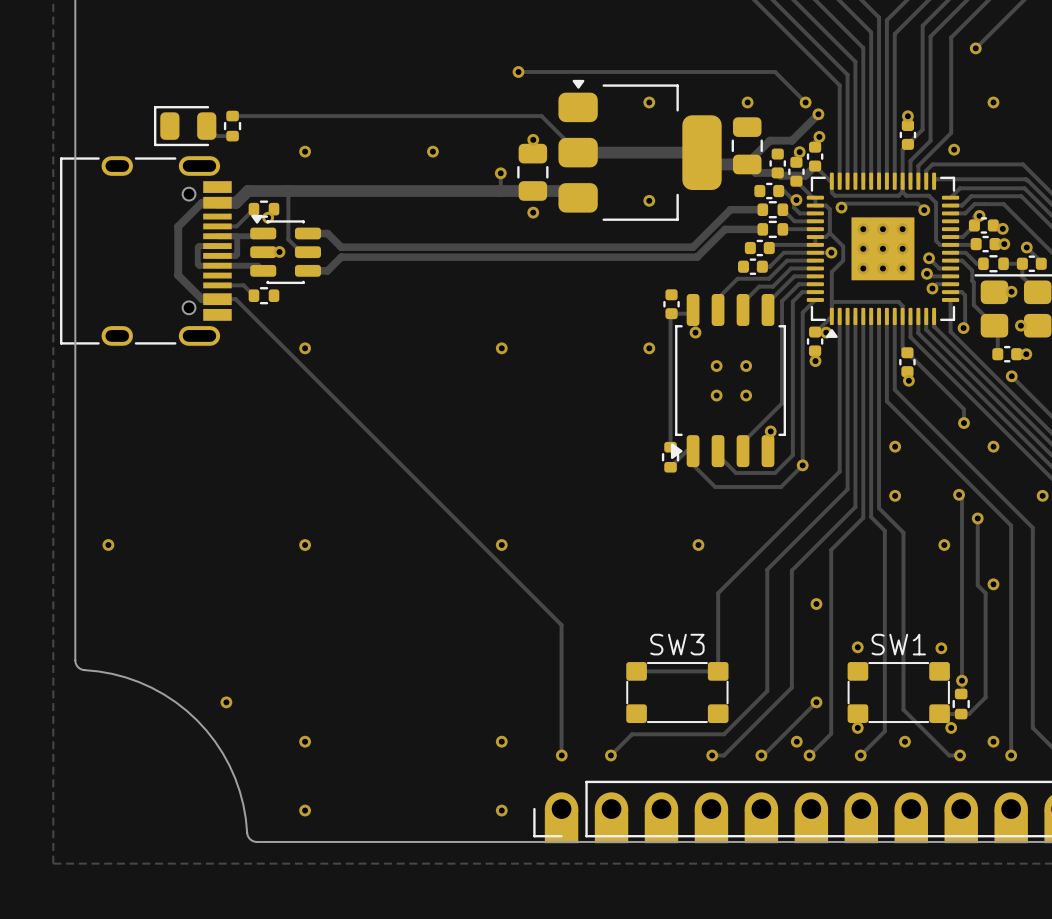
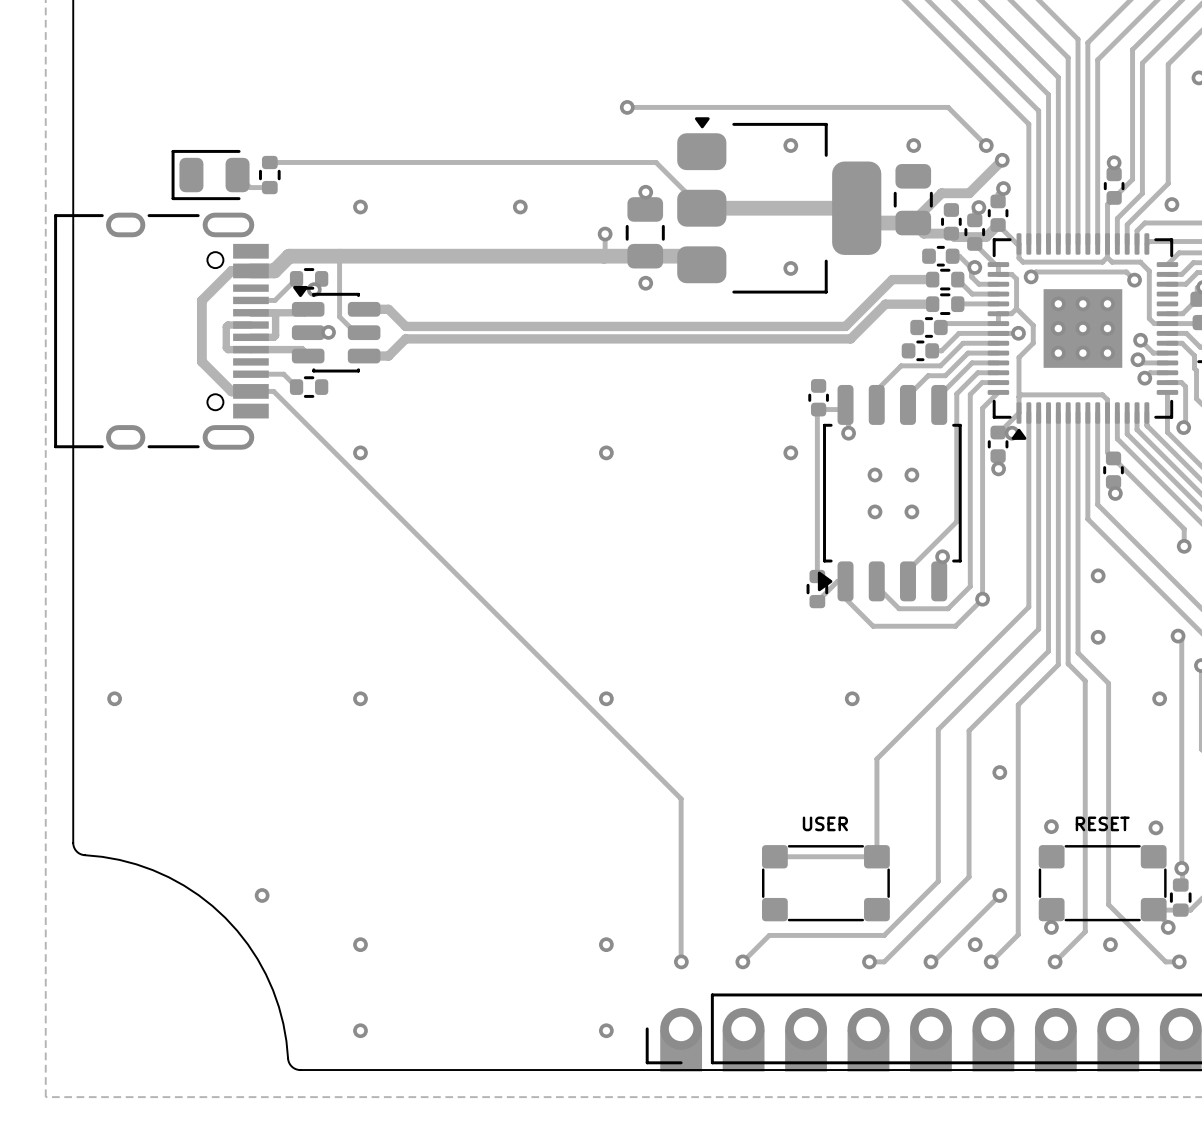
SW3 name: SW3 (677, 644) -> none
SW1 name: SW1 (898, 644) -> none
text: none -> USER (825, 823)
text: none -> RESET (1102, 823)

